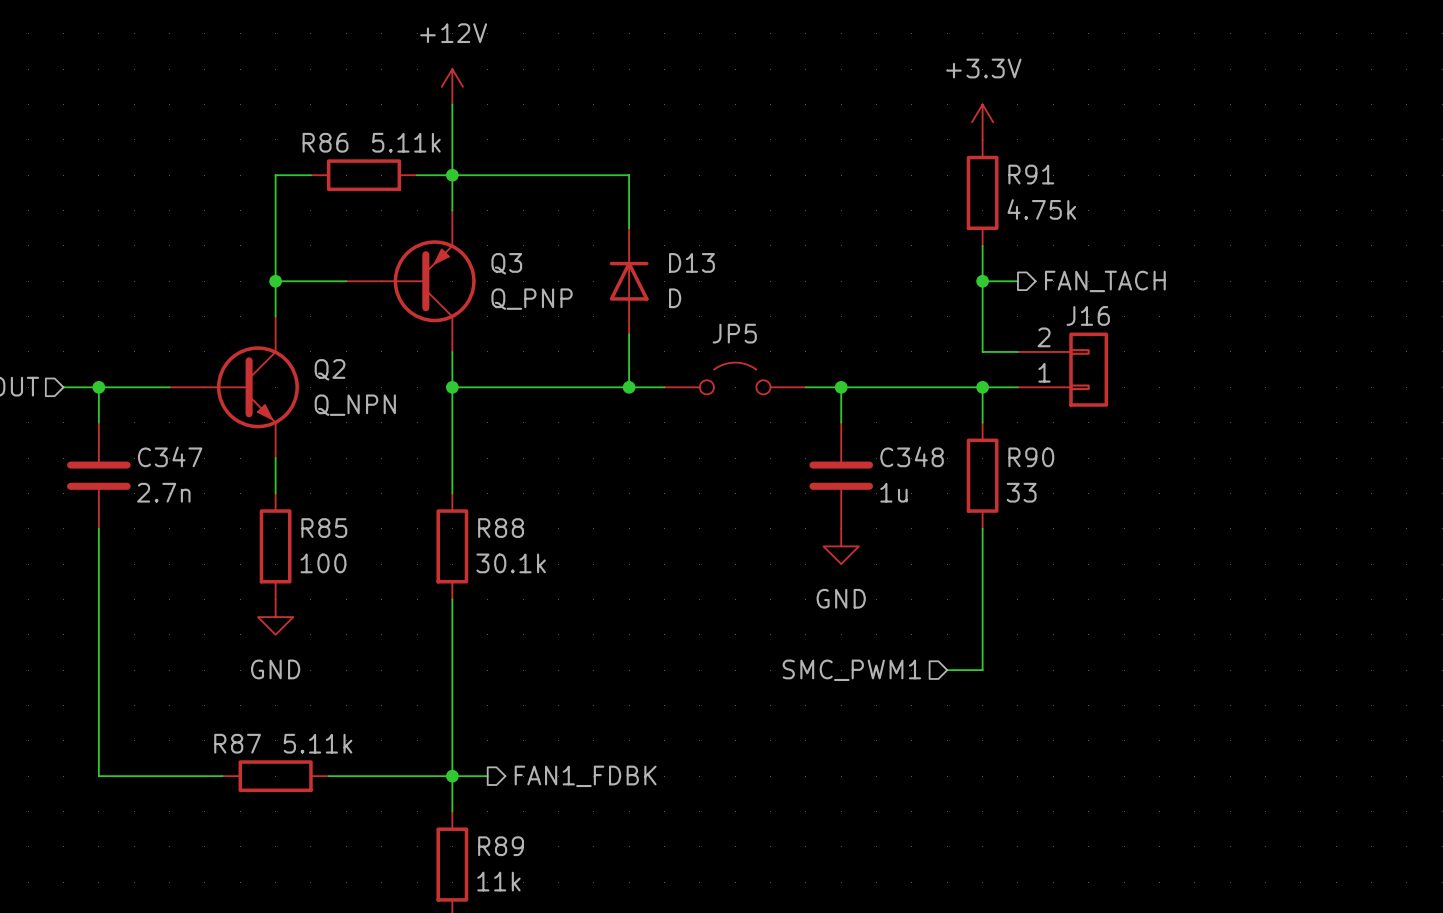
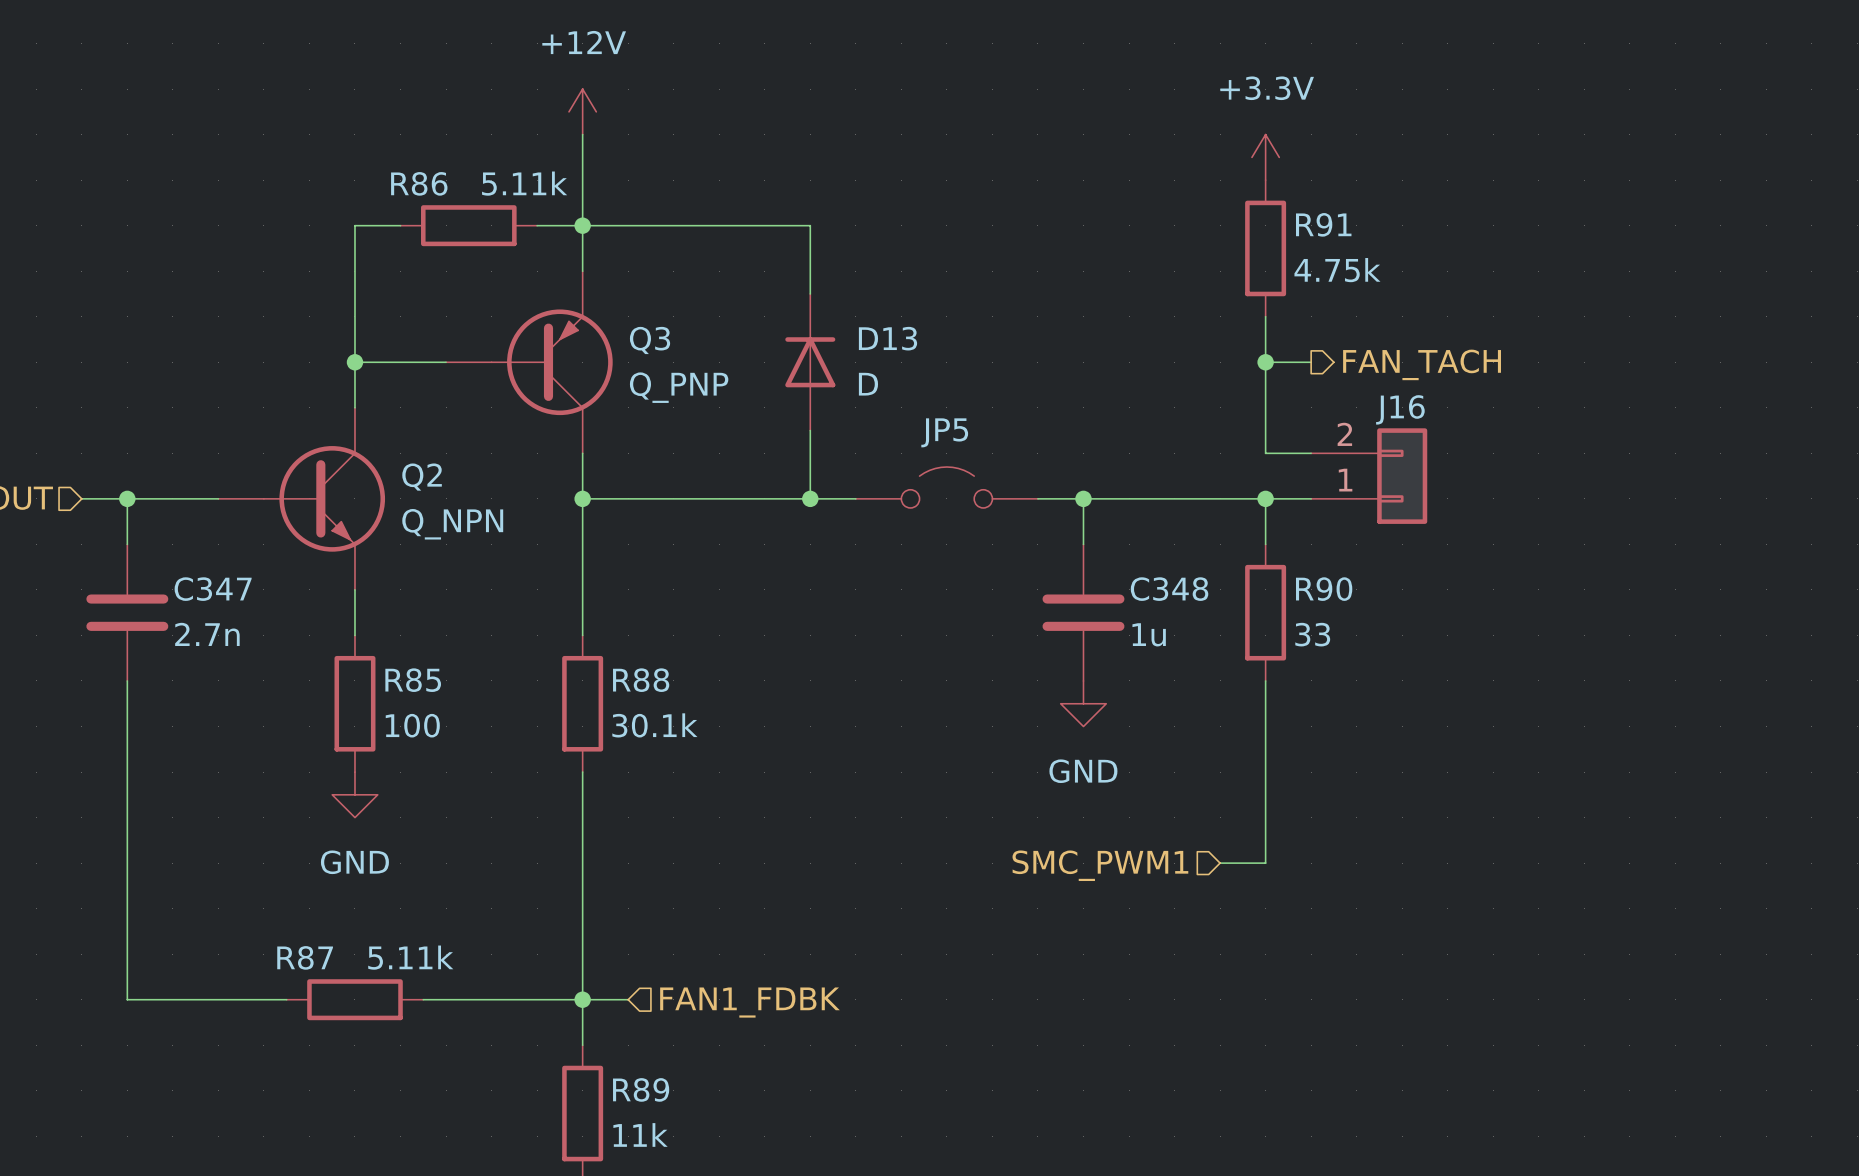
hierarchical label shape: output (585, 776) -> input (749, 1002)

